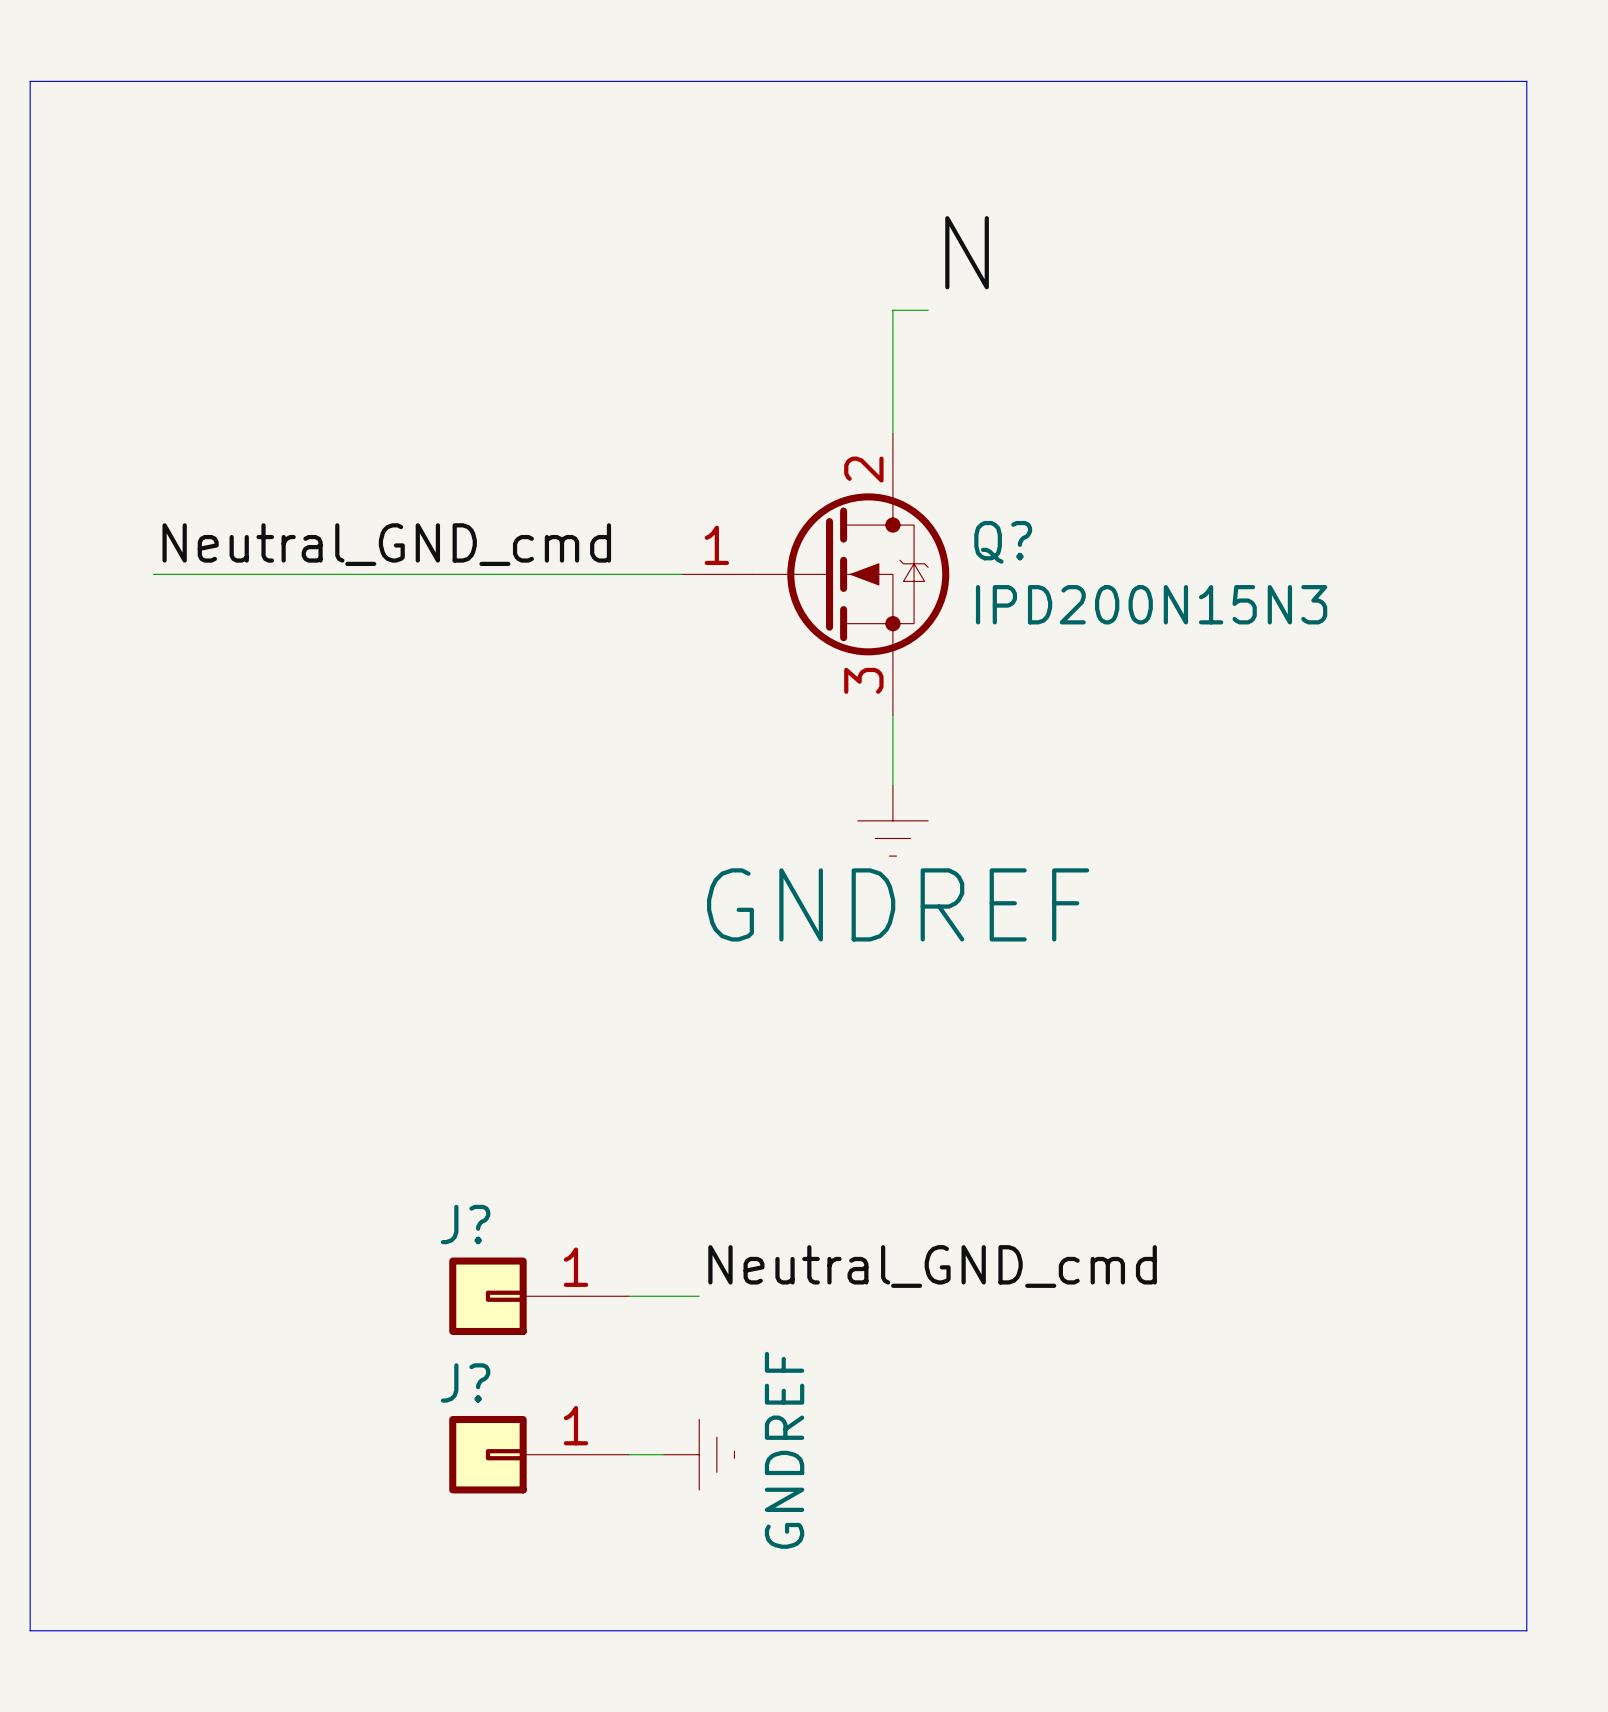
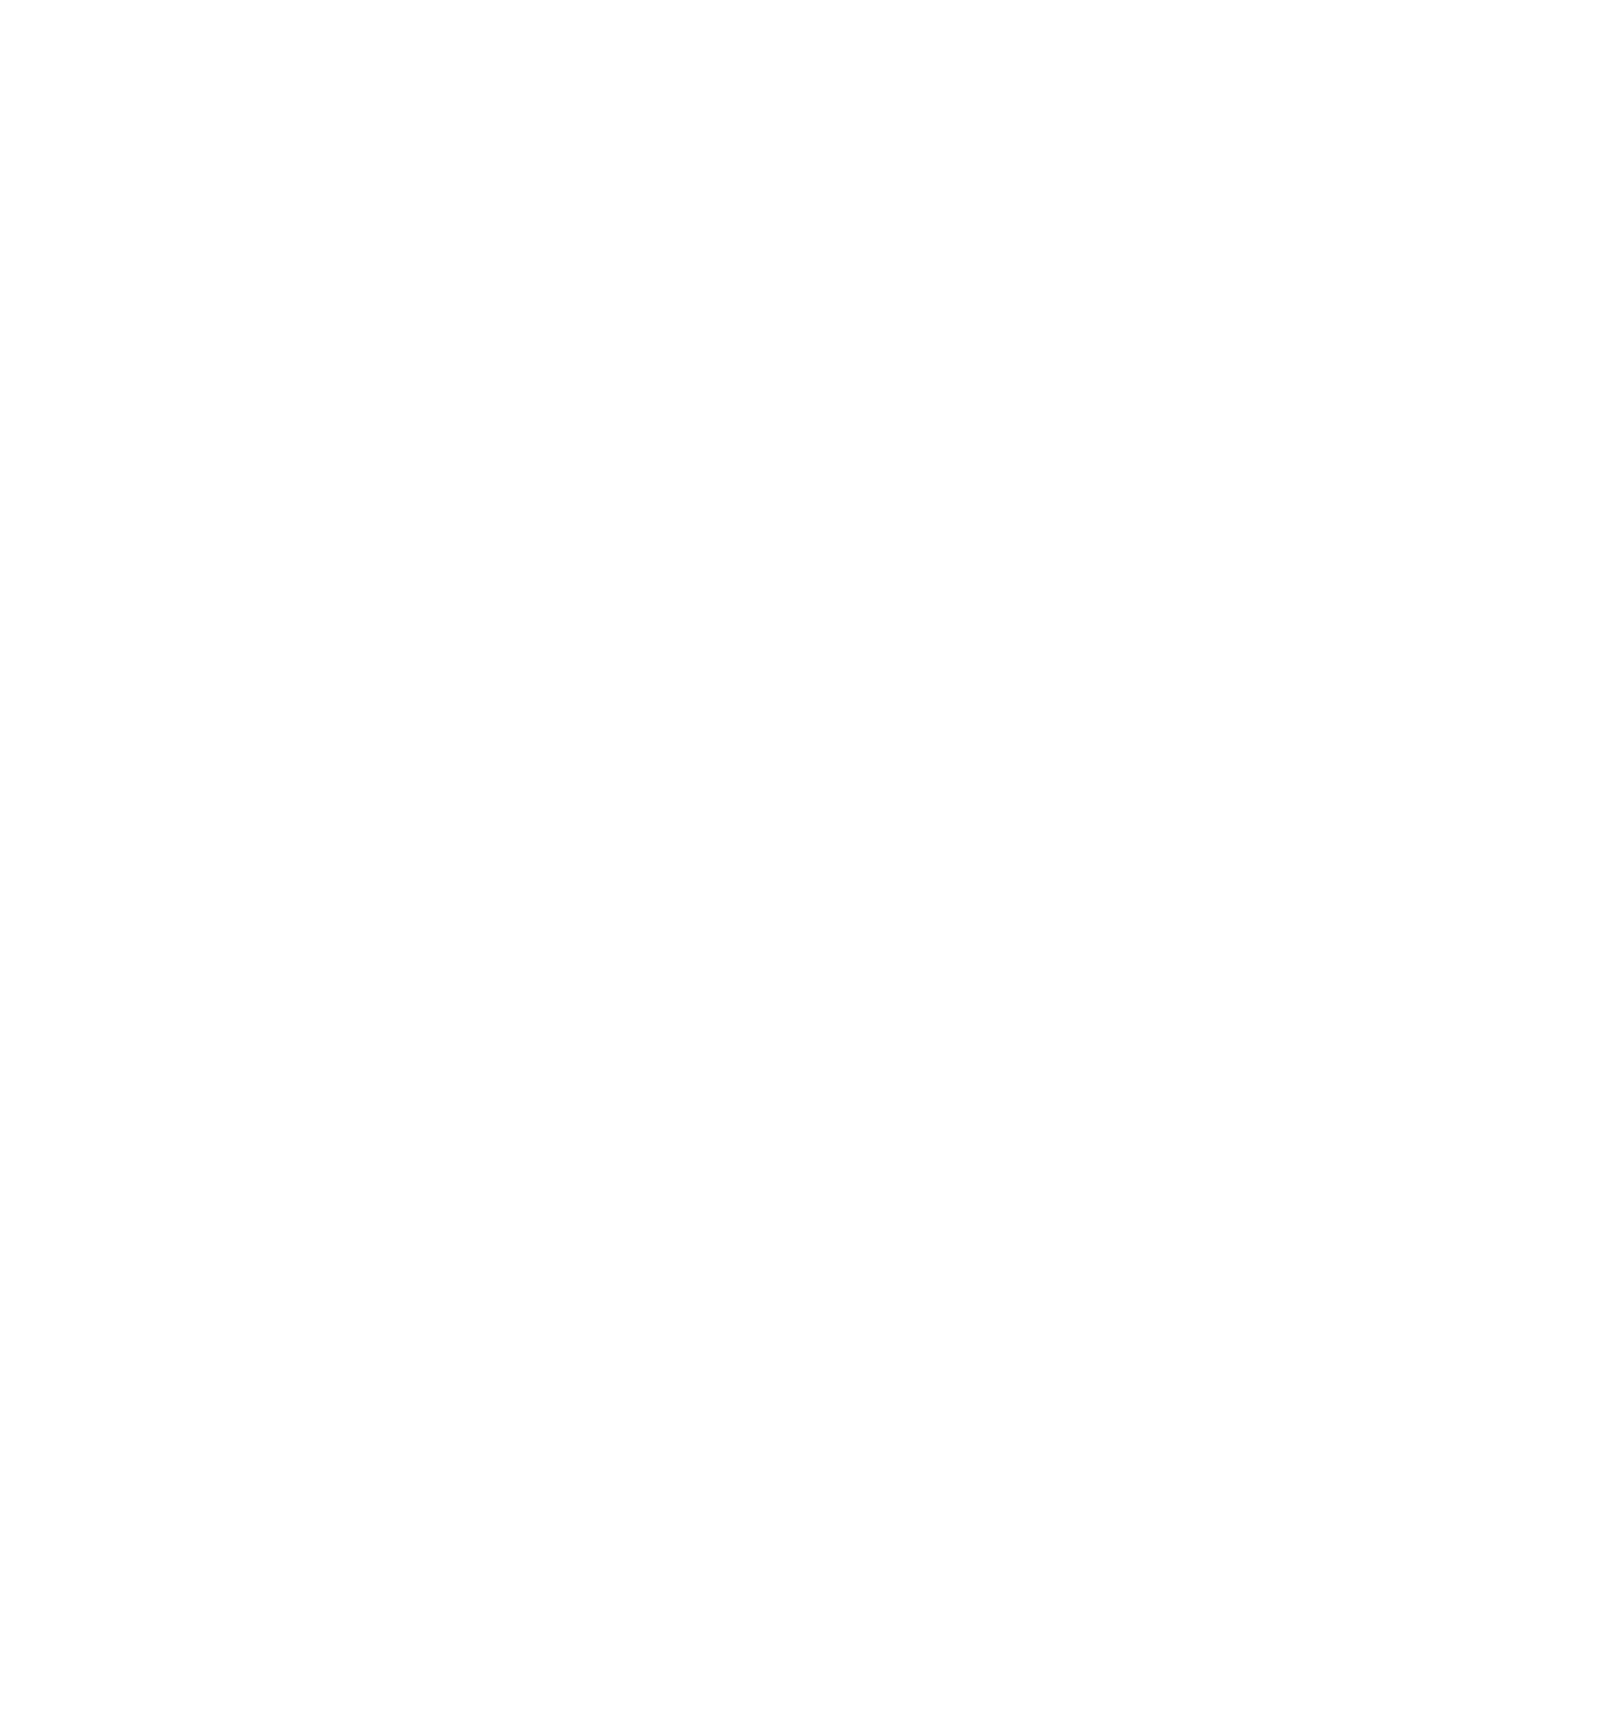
line: (30, 81) (1526, 81) (1526, 1630) (30, 1630) (30, 81) -> none
label: N (967, 252) -> none
wire: (928, 310) (892, 310) (892, 433) -> none
label: Neutral_GND_cmd (386, 544) -> none
wire: (153, 574) (681, 574) -> none
Q?: IPD200N15N3 (815, 574) -> none
wire: (892, 715) (892, 785) -> none
power symbol: GNDREF (892, 820) -> none
label: Neutral_GND_cmd (932, 1266) -> none
J?: (539, 1296) -> none
wire: (628, 1296) (699, 1296) -> none
J?: (539, 1454) -> none
wire: (628, 1454) (664, 1454) -> none
power symbol: GNDREF (699, 1454) -> none

